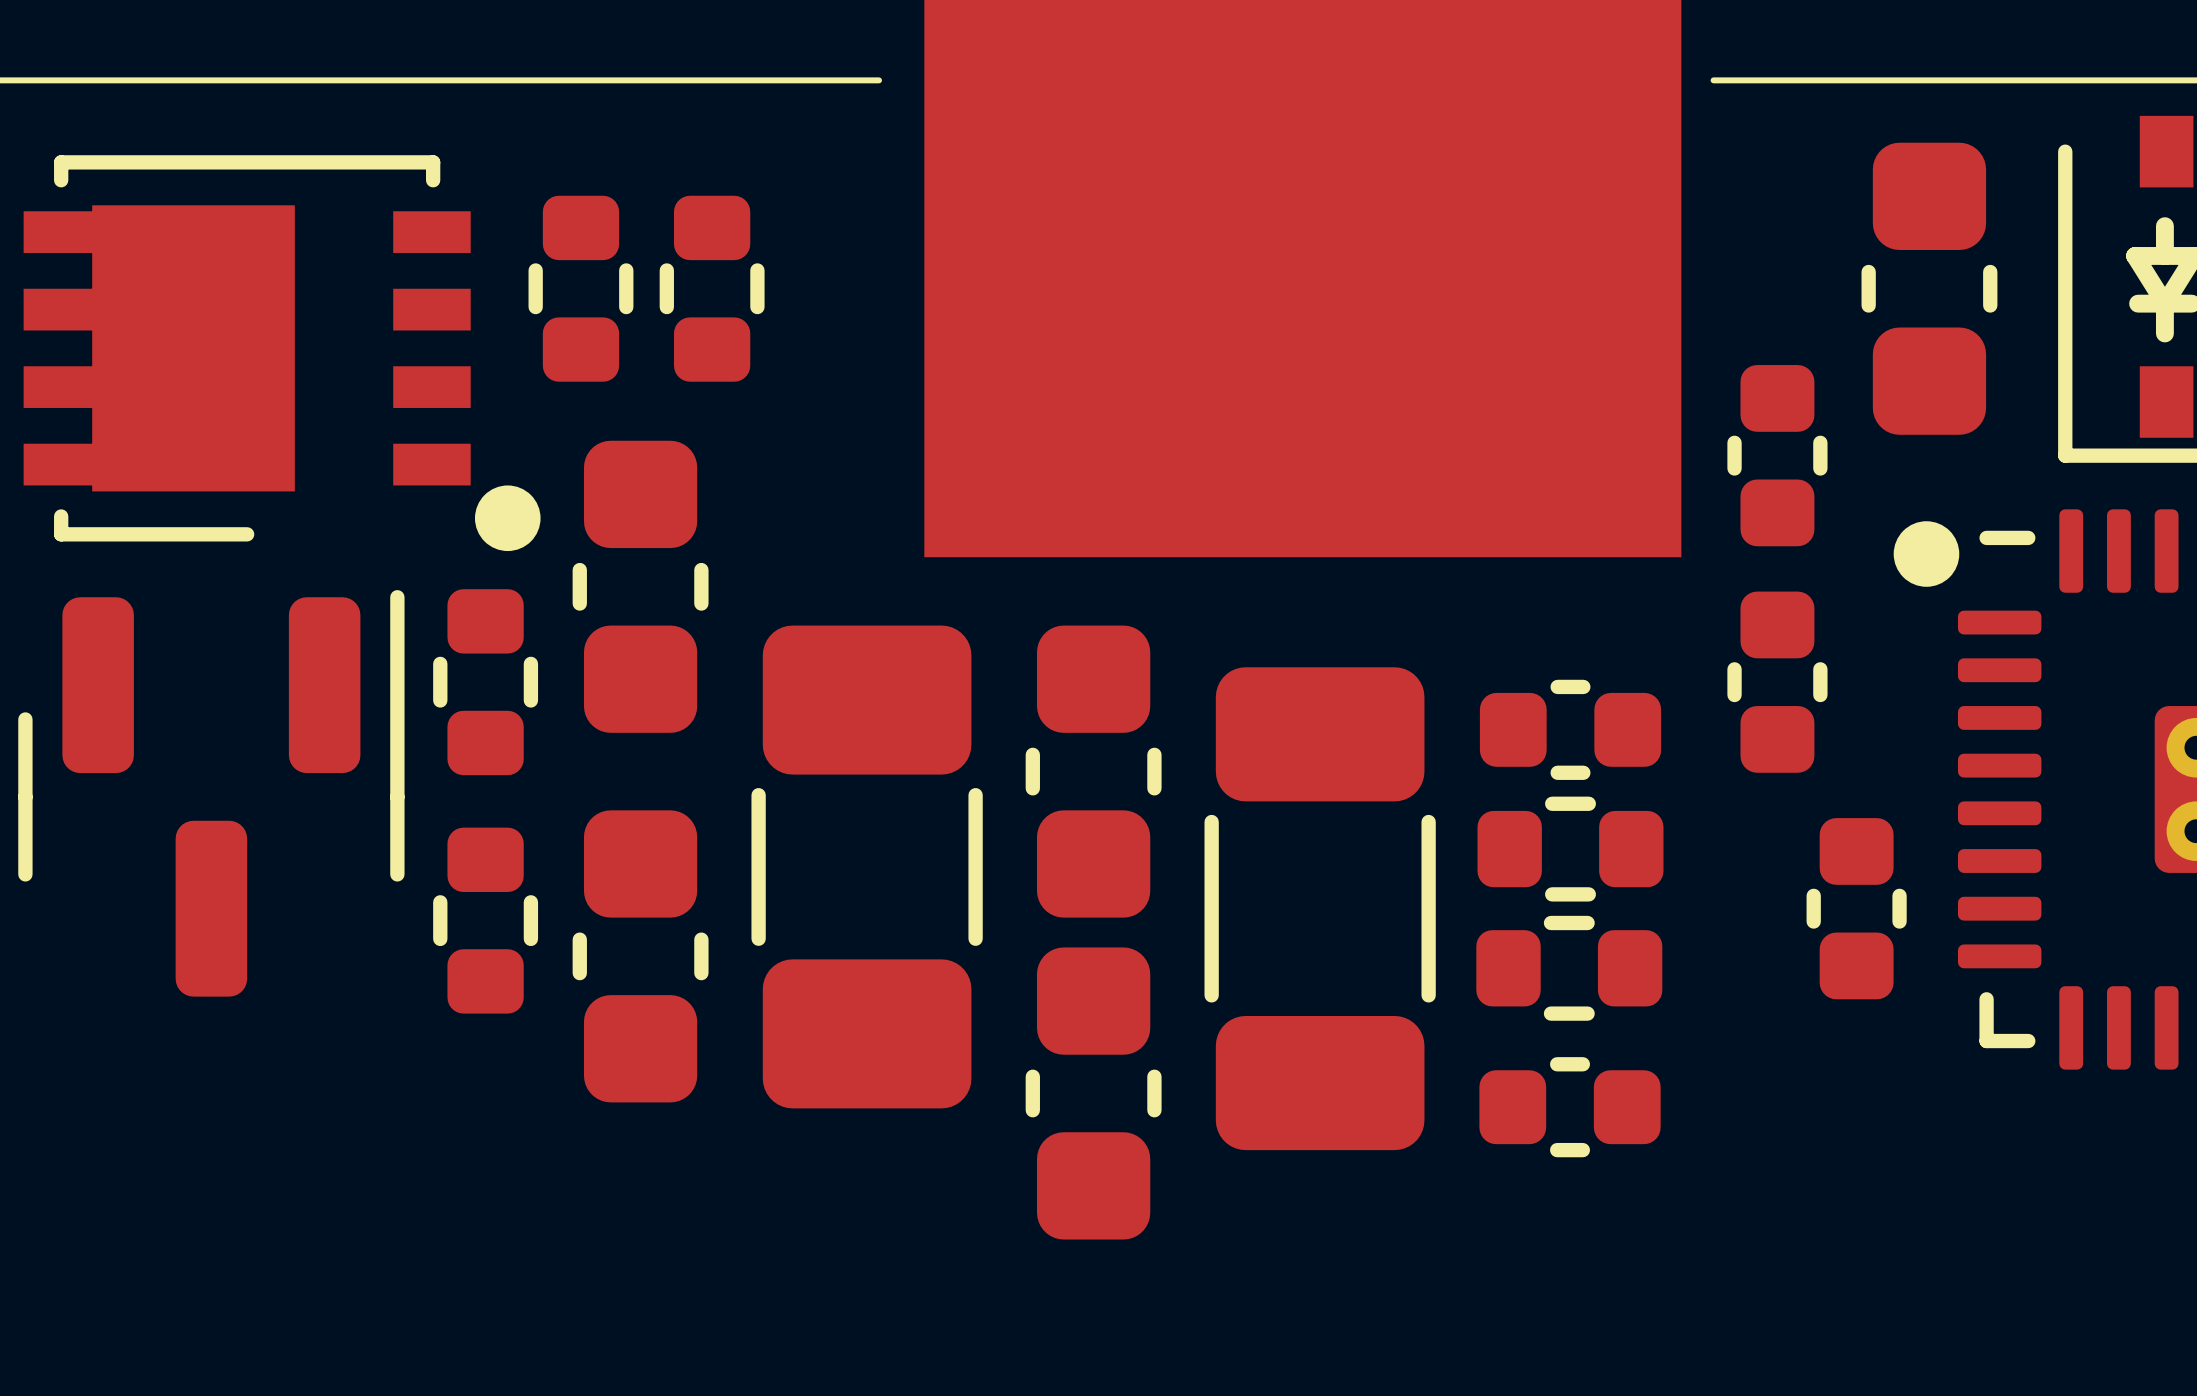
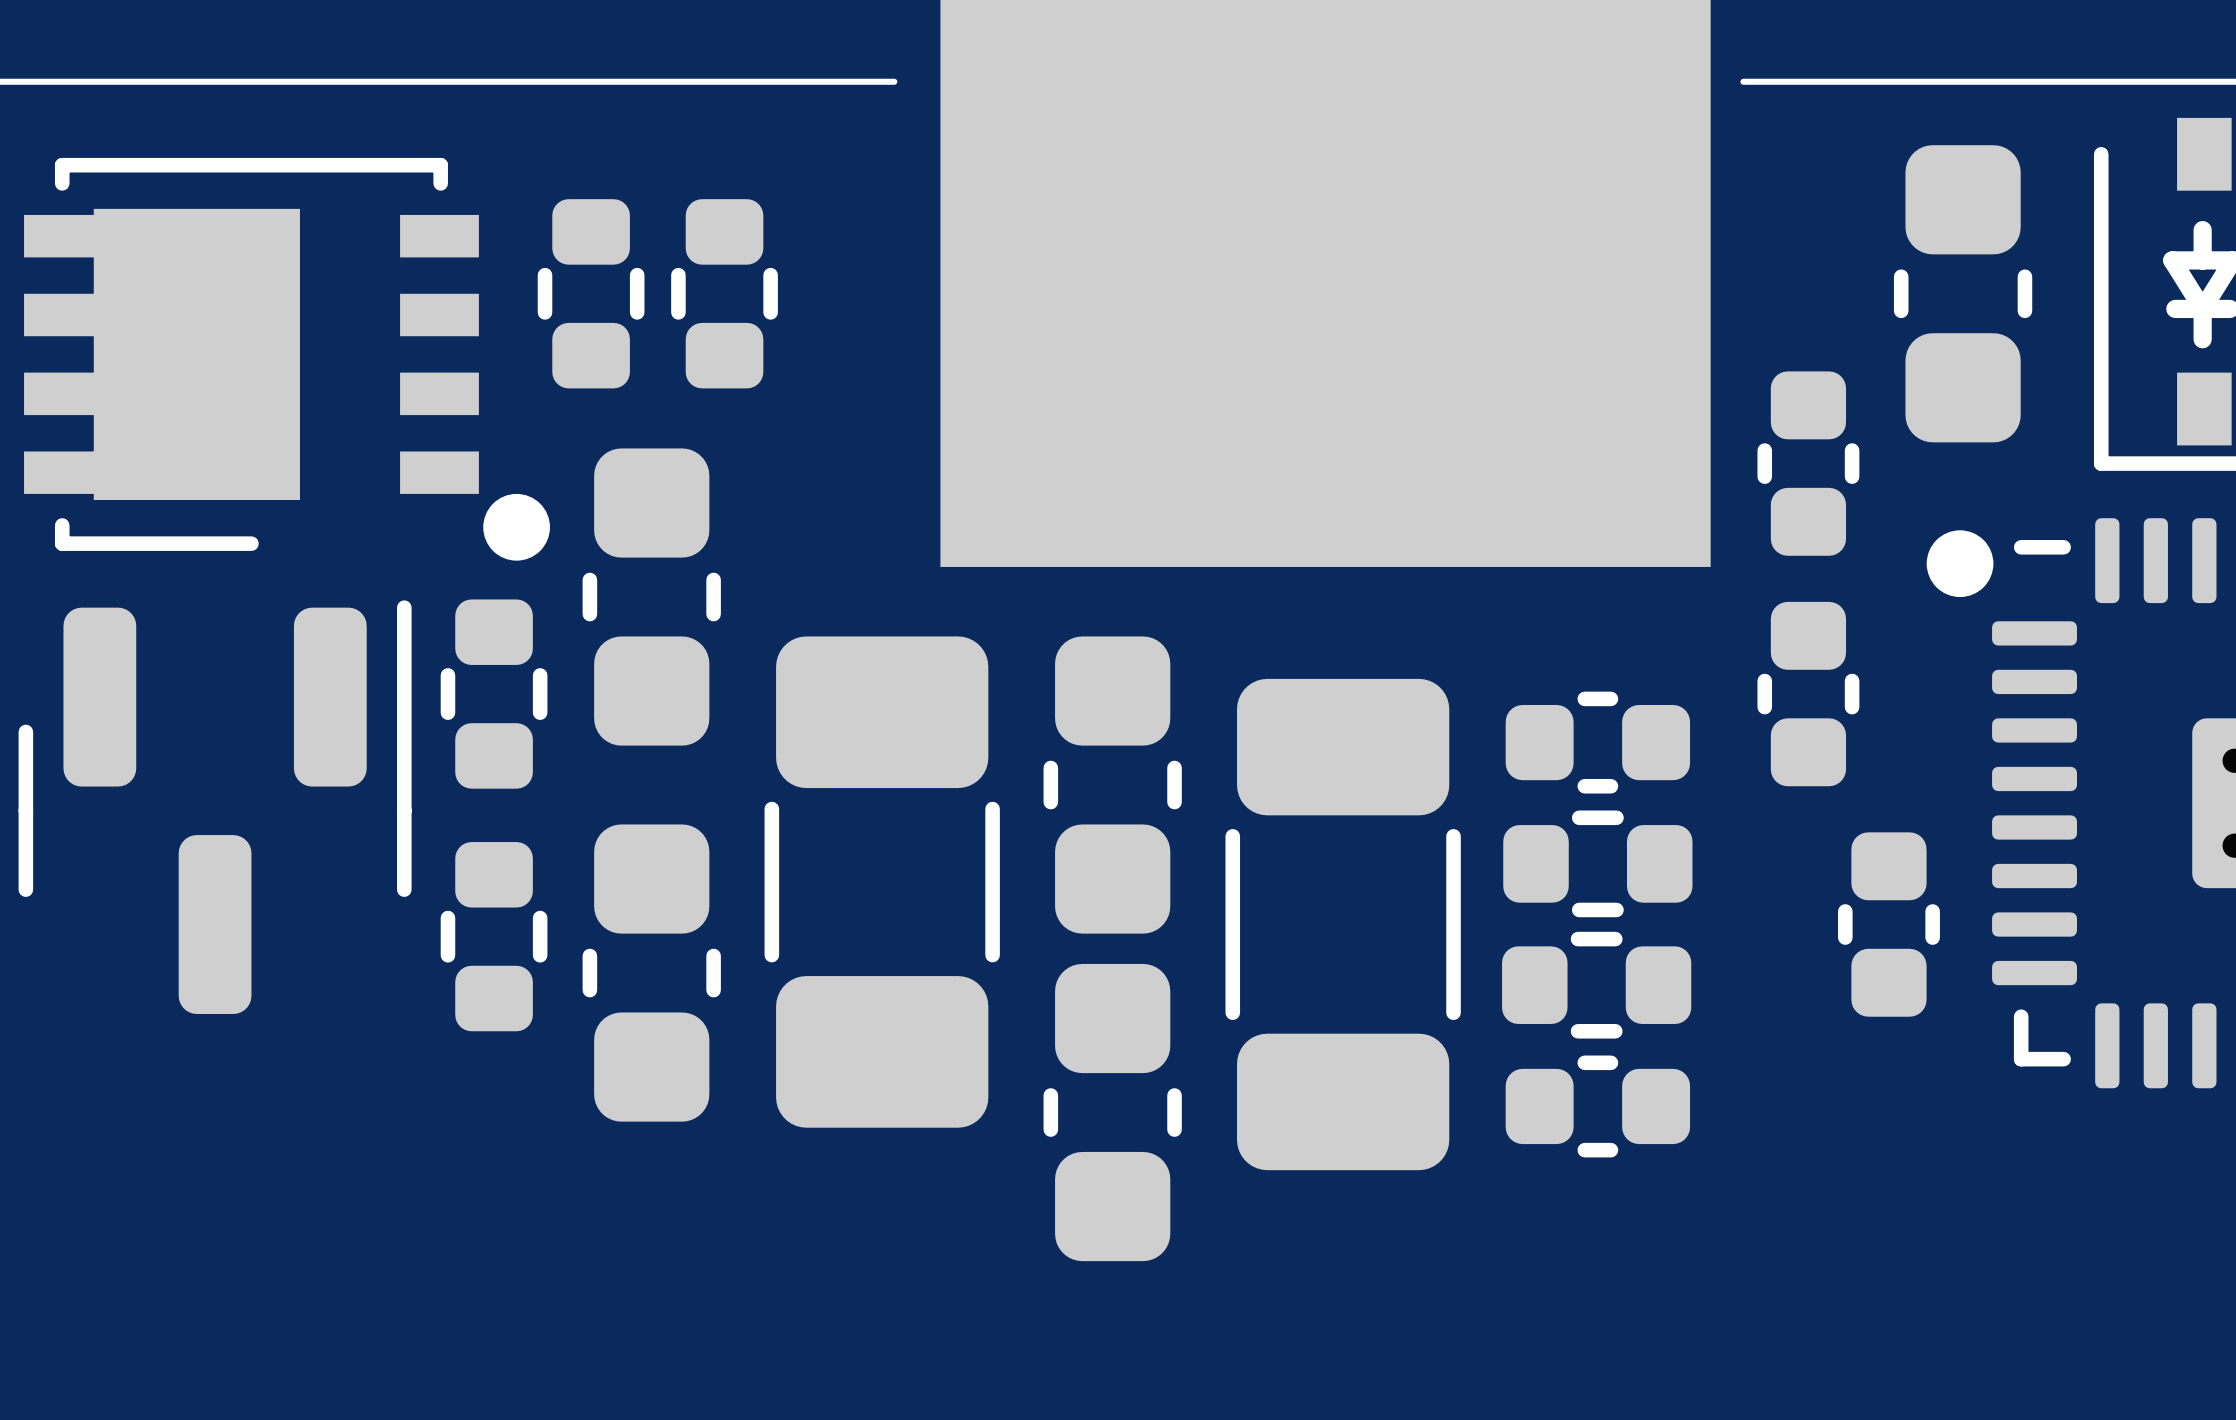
part position: (1570, 1107) -> (1597, 1106)

